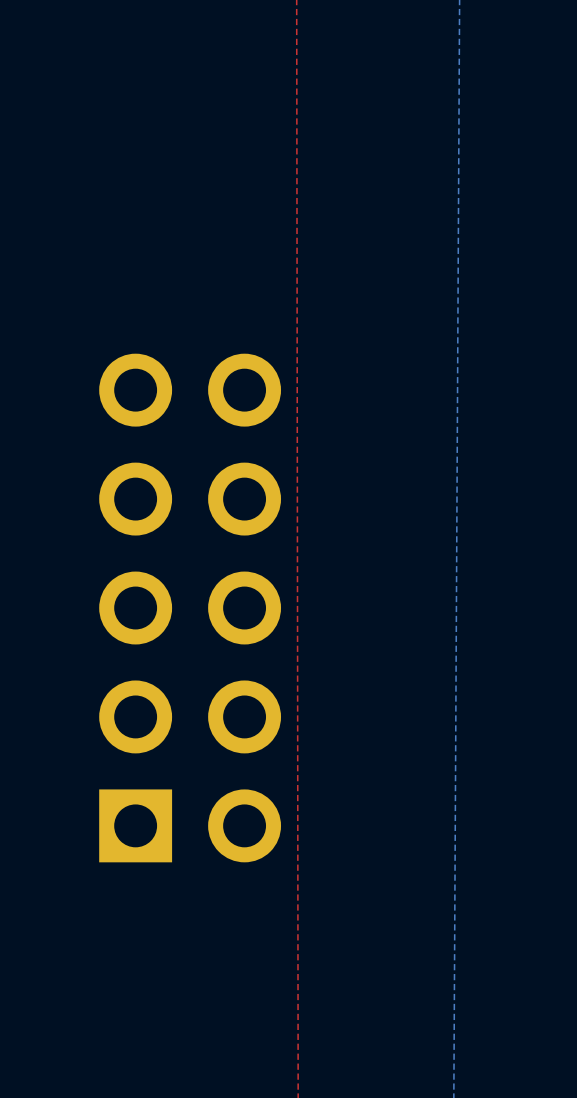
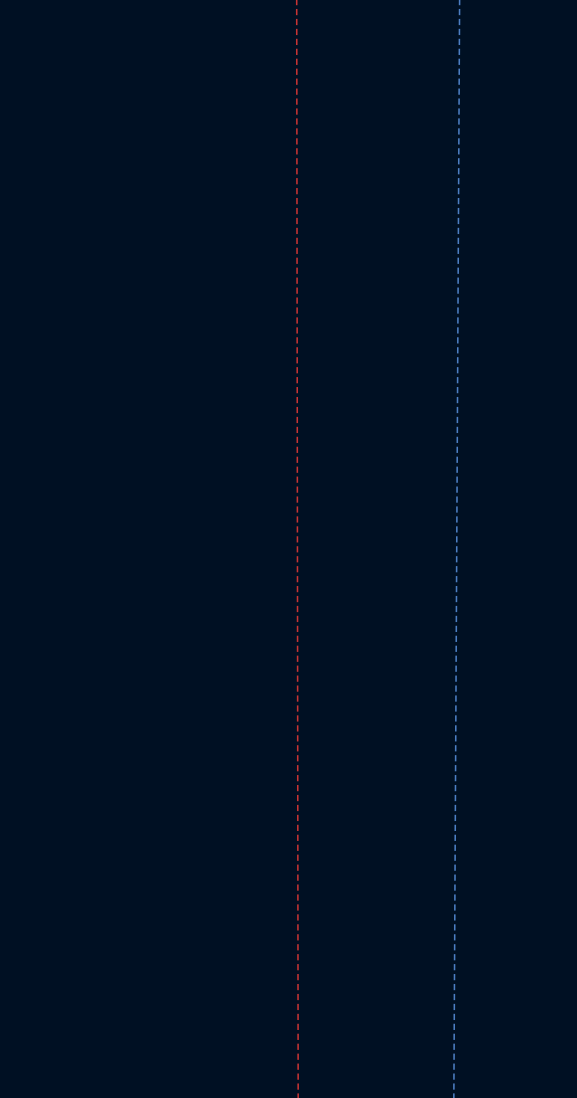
part: (190, 608) -> none

